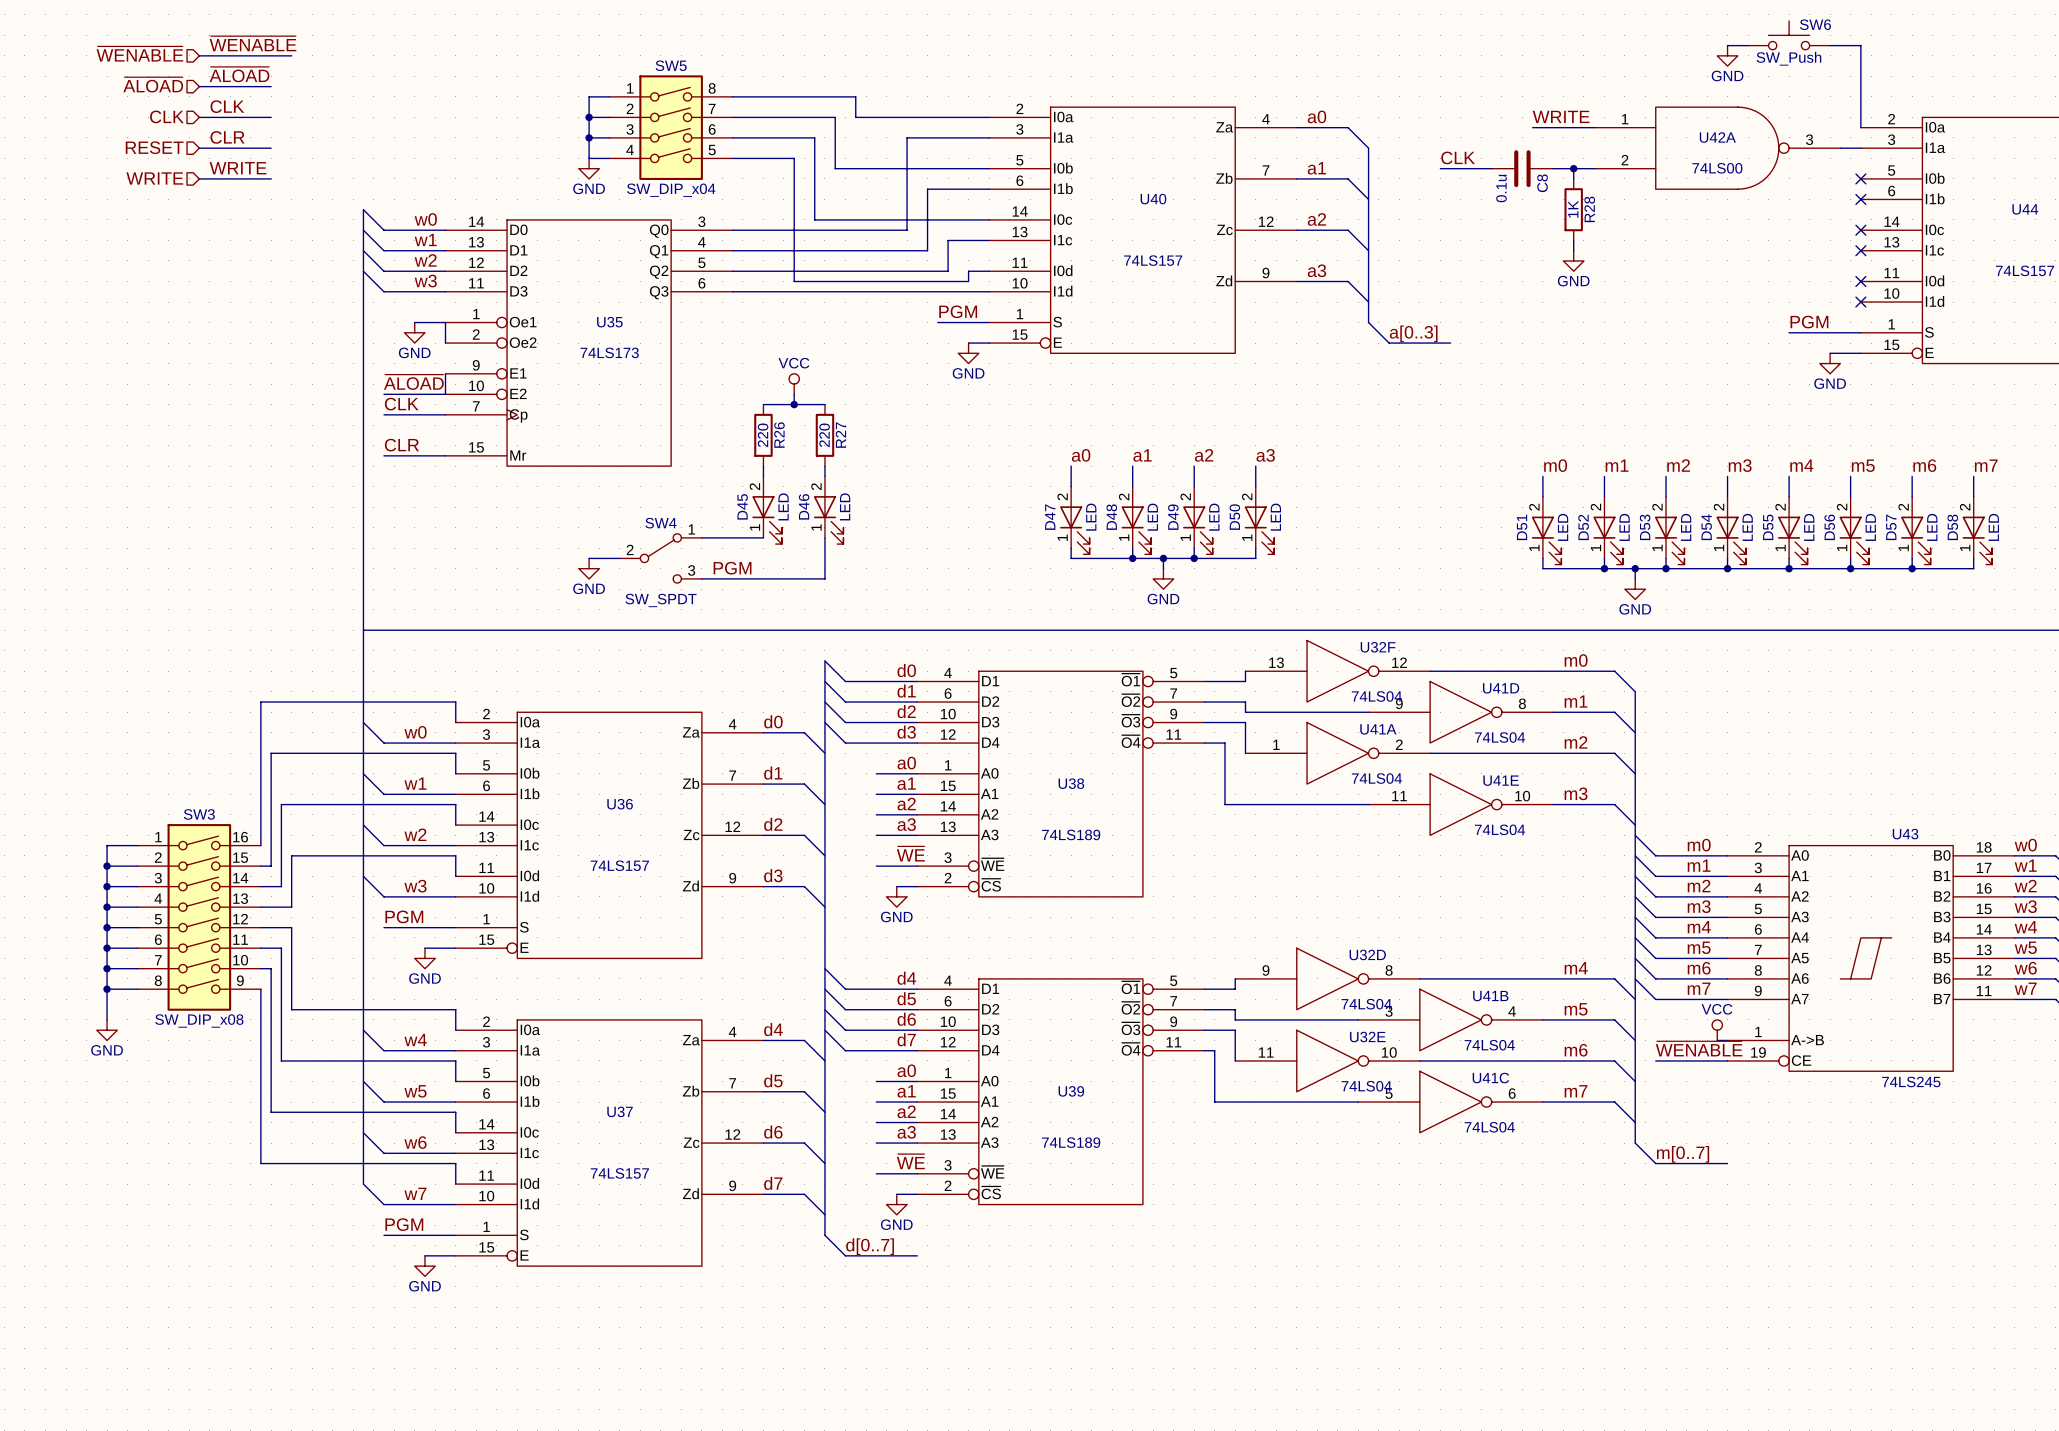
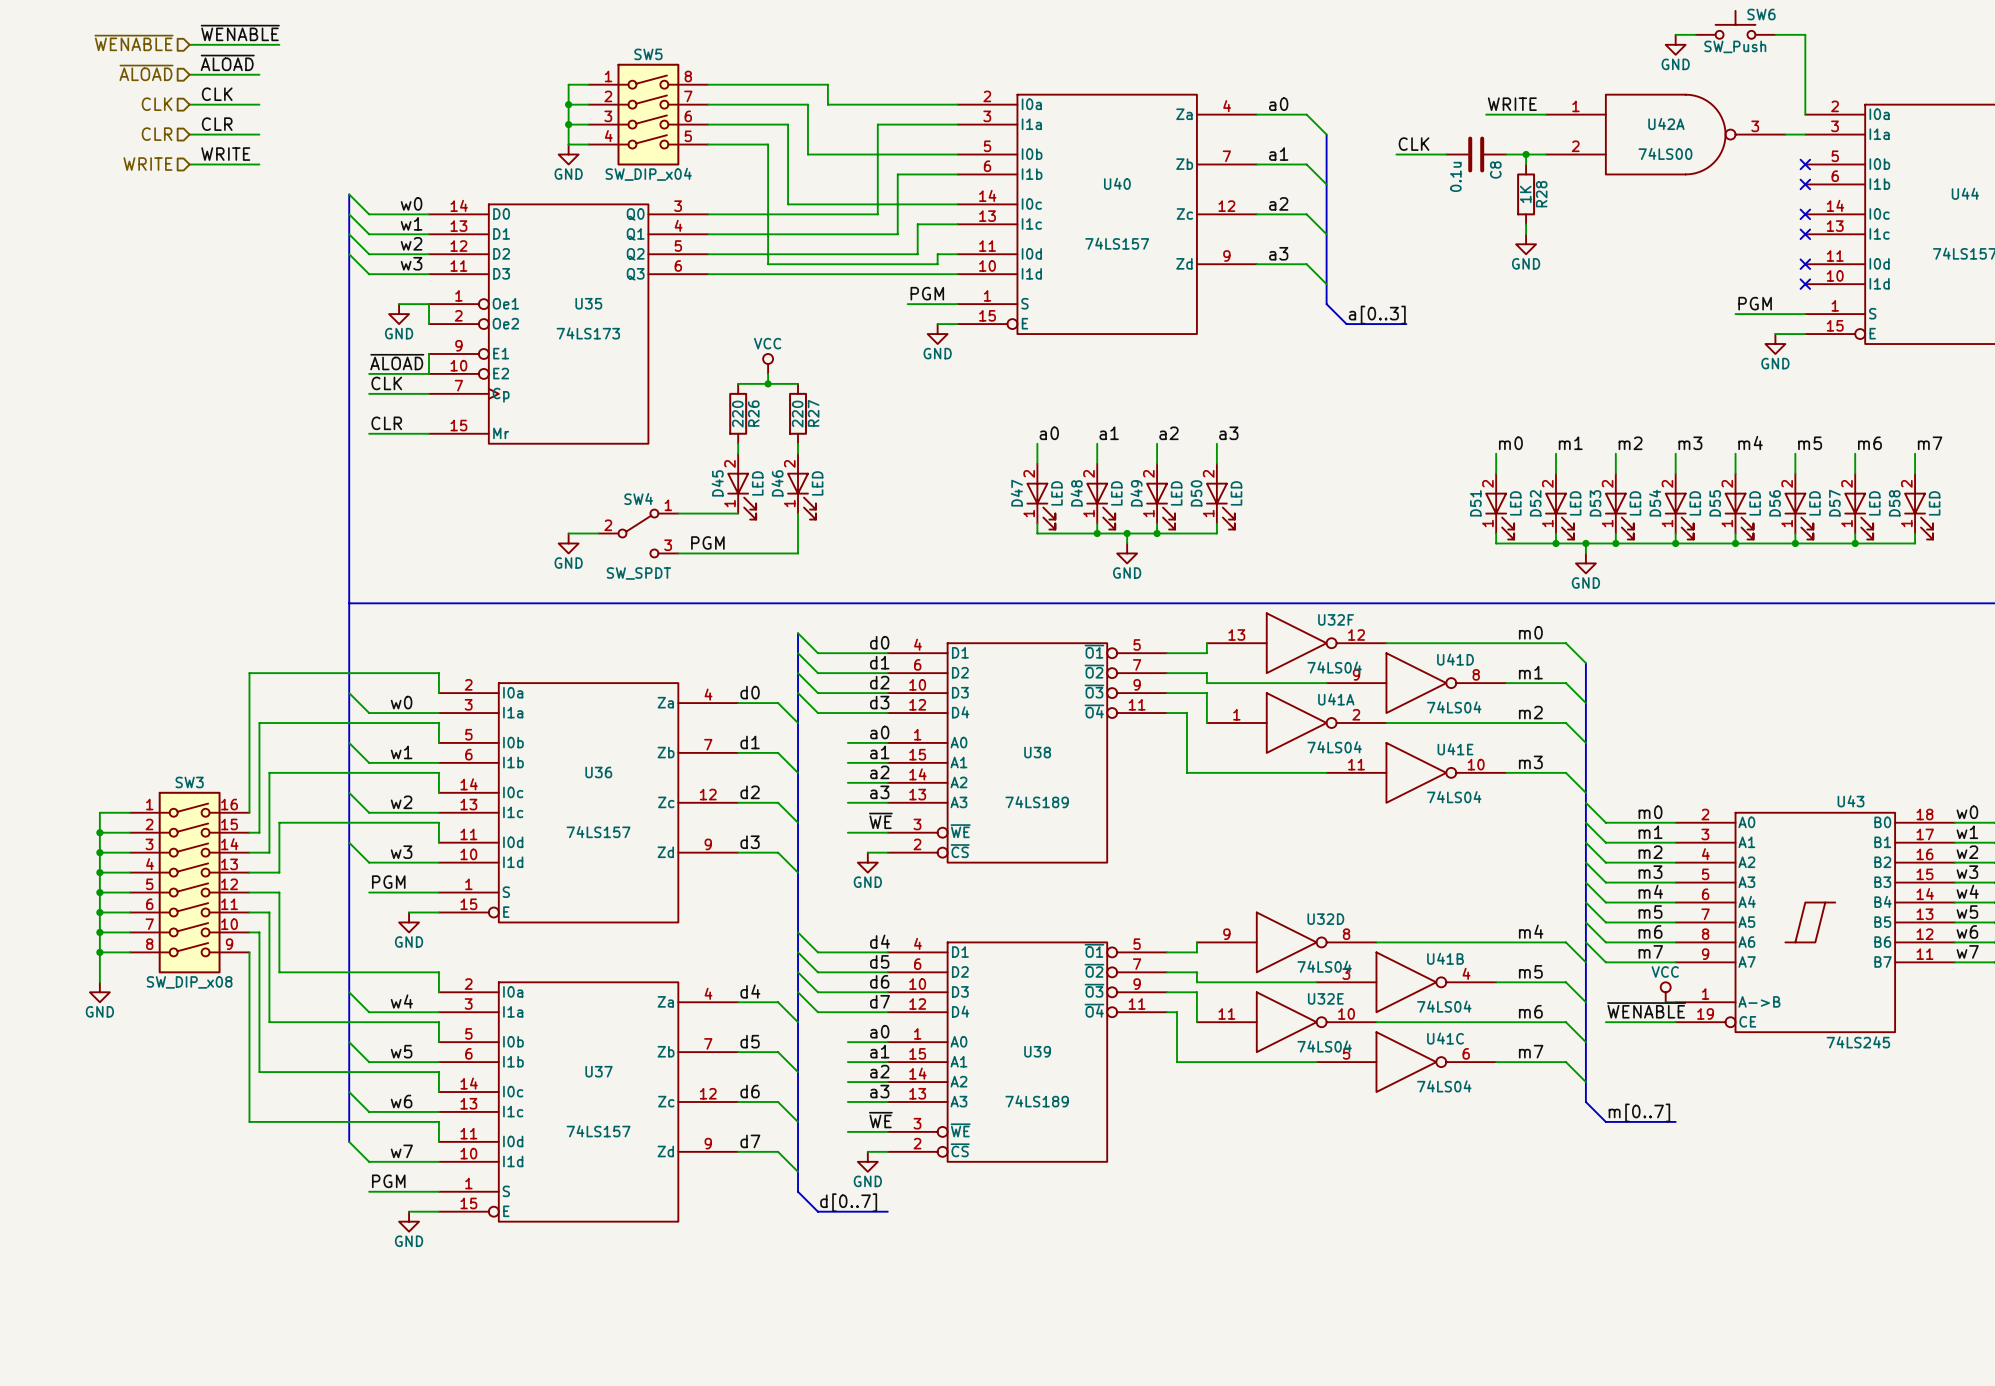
hierarchical label: RESET (154, 147) -> CLR (157, 134)

